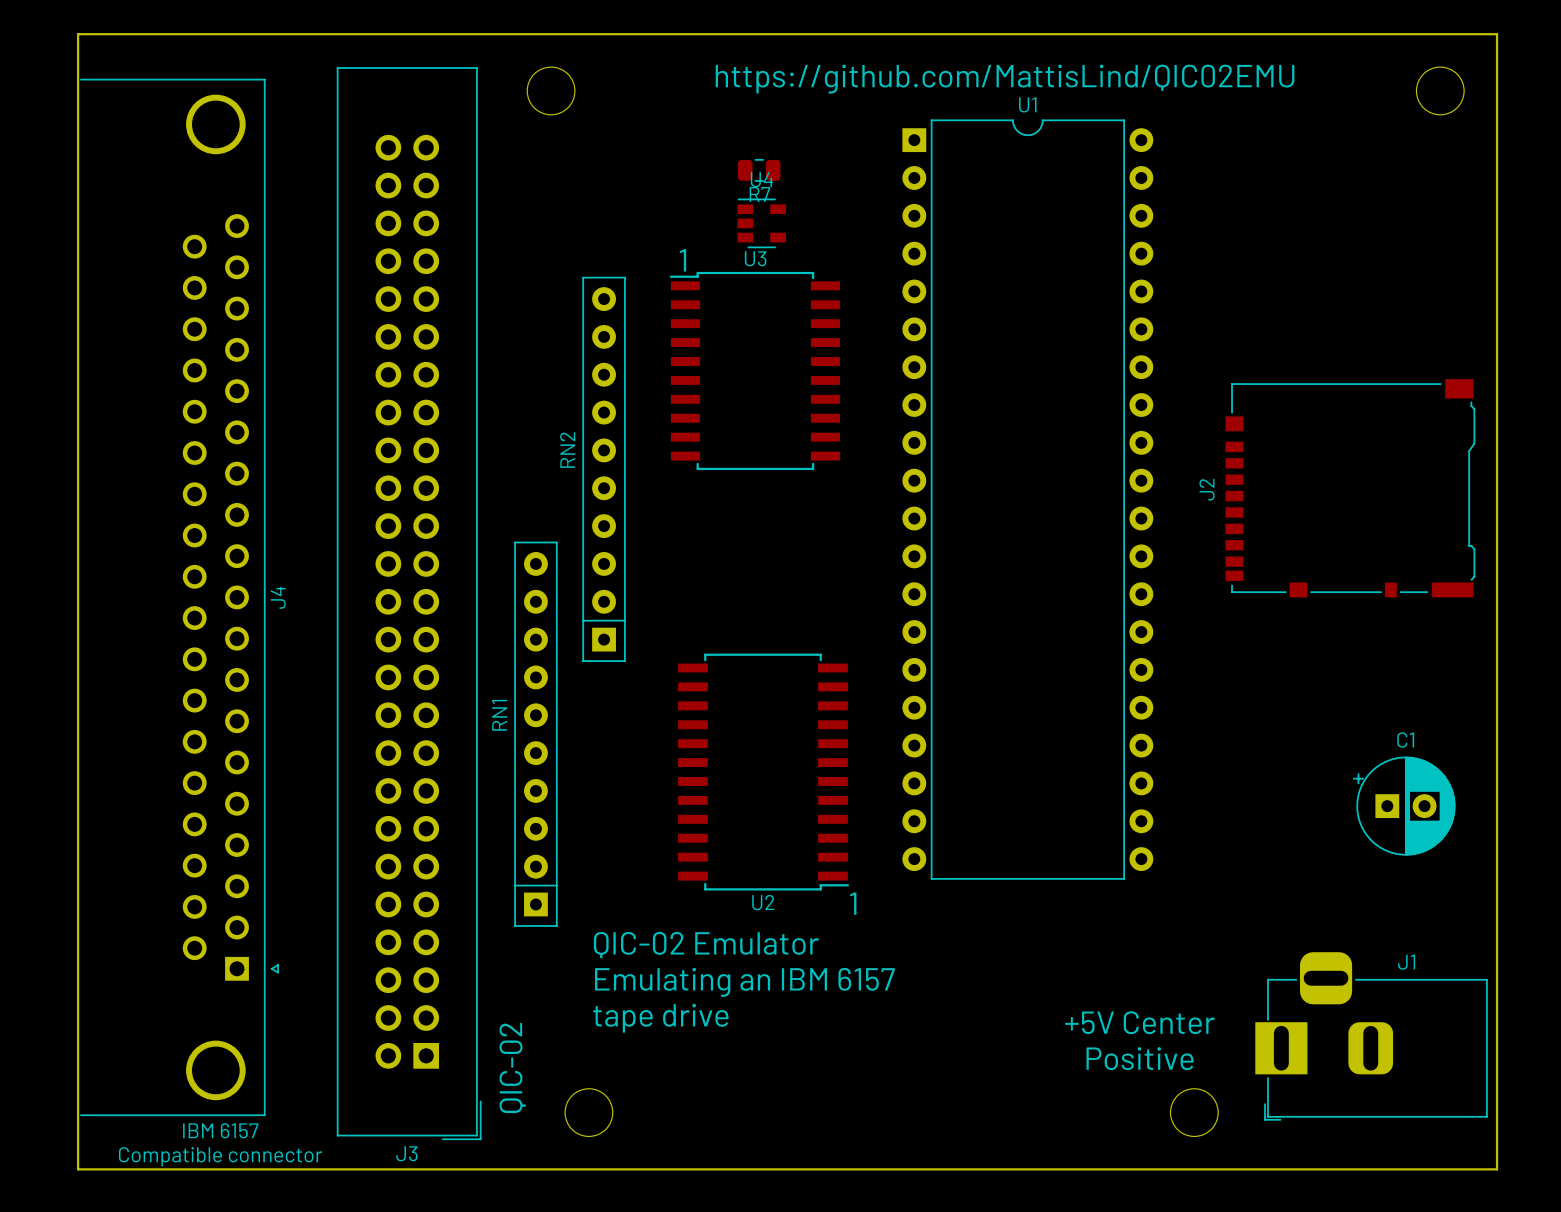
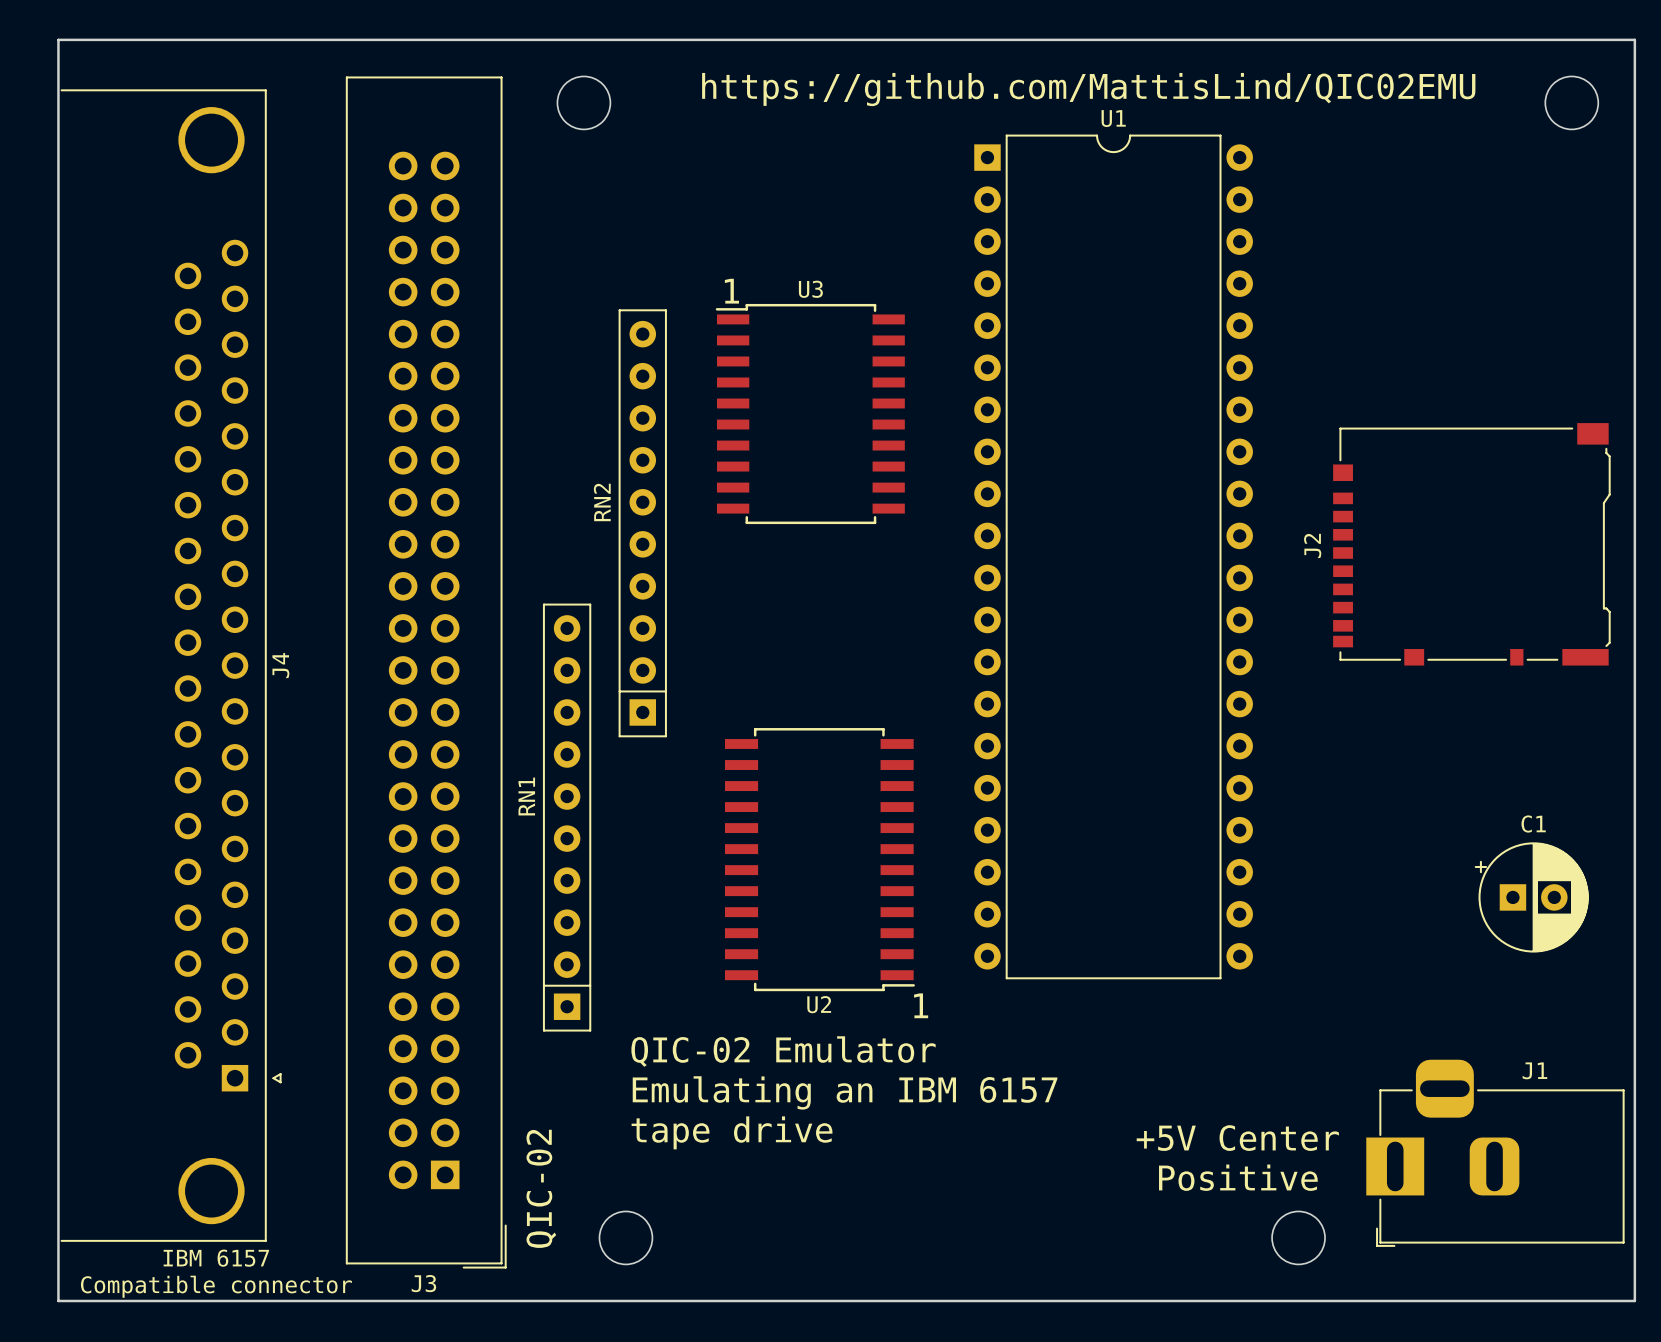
R7: (759, 170) -> none
U4: (761, 223) -> none

